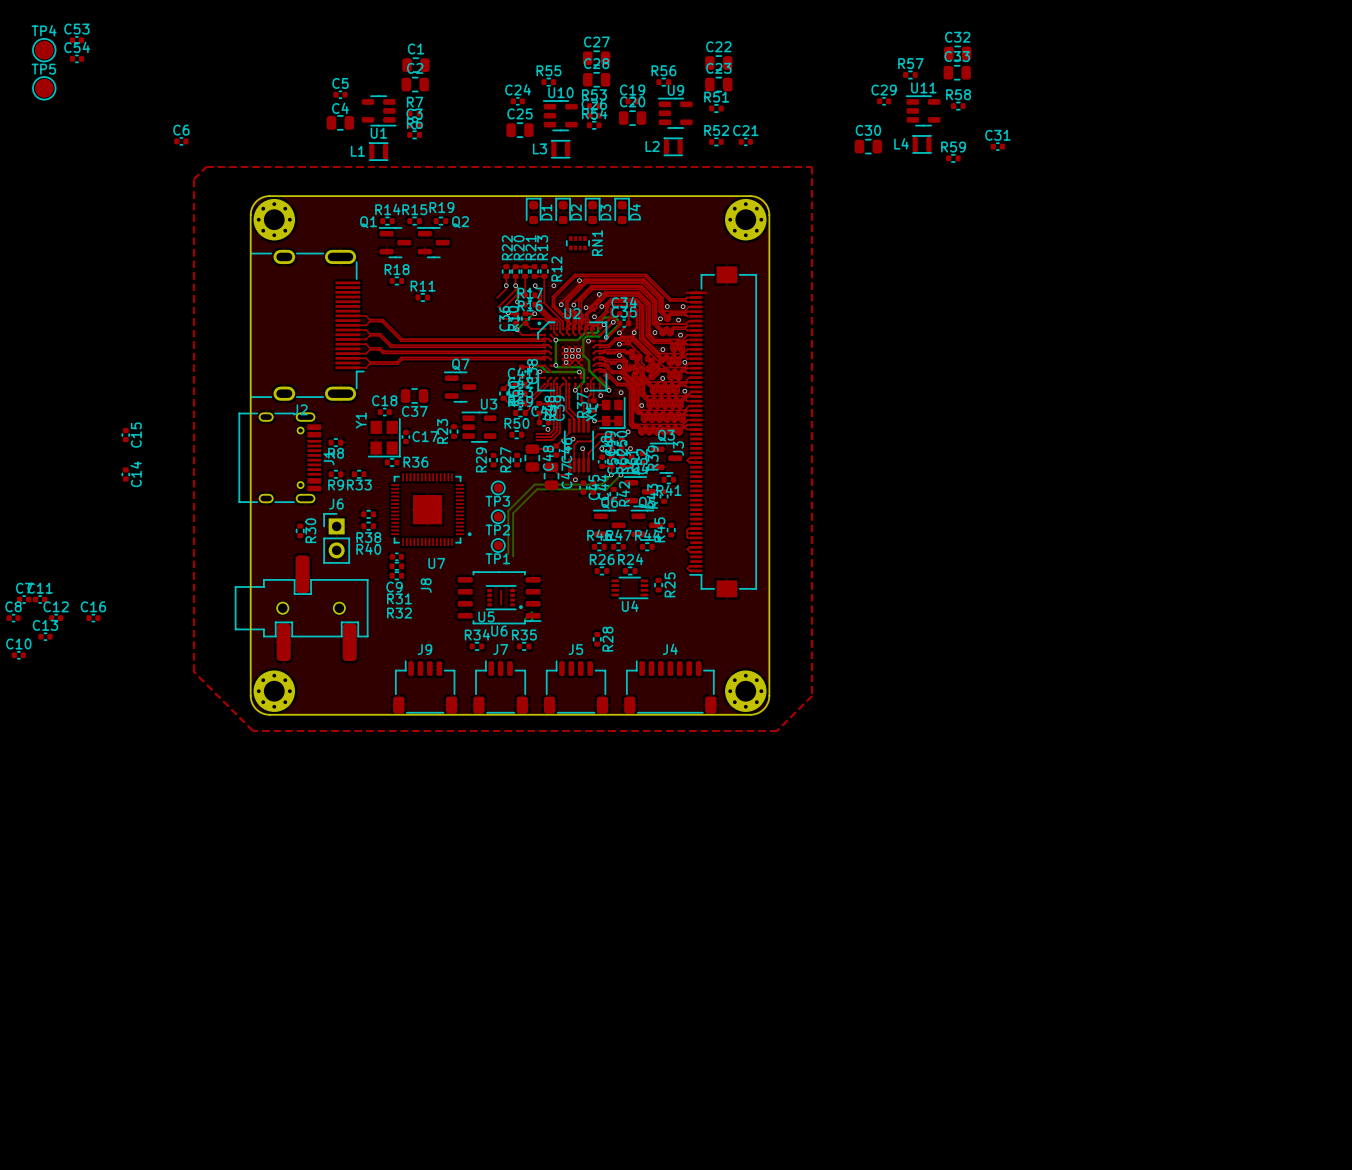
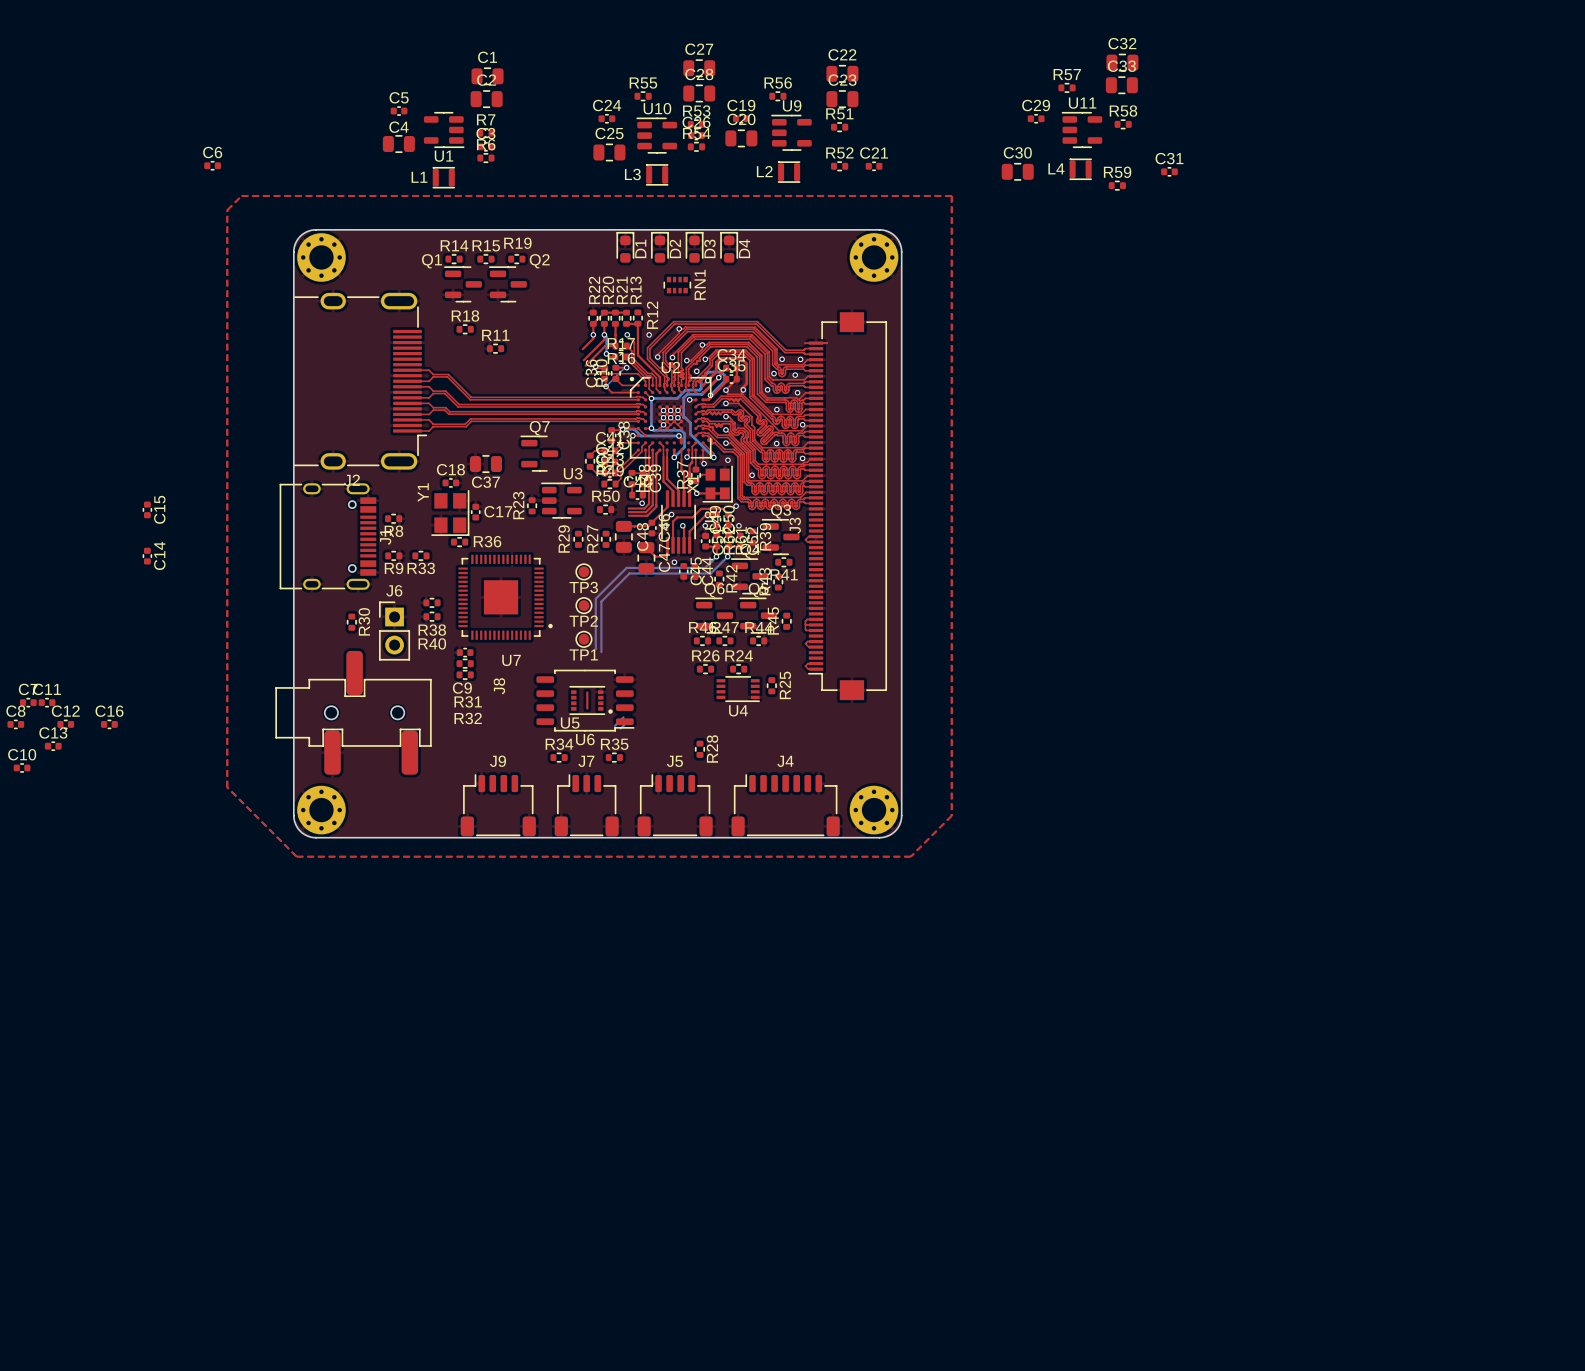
C53: (76, 40) -> none
TP4: (44, 50) -> none
C54: (76, 58) -> none
TP5: (44, 88) -> none

